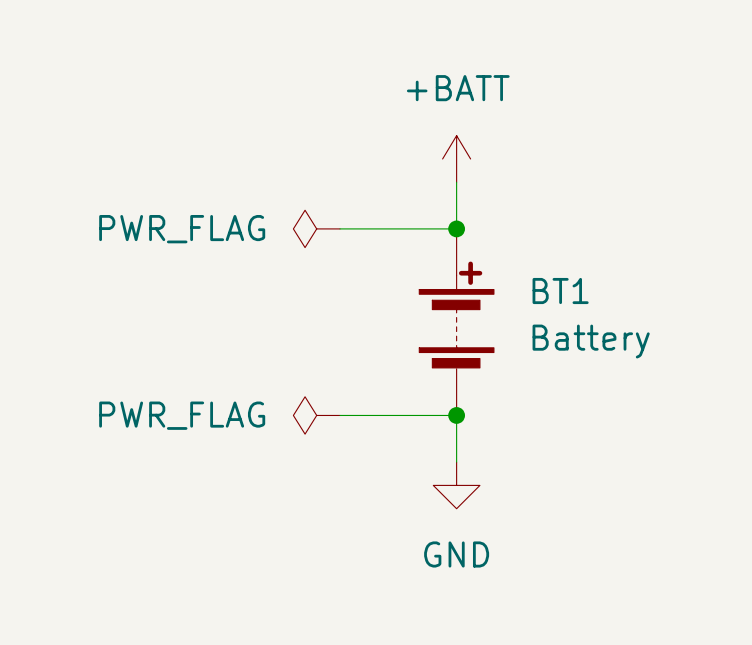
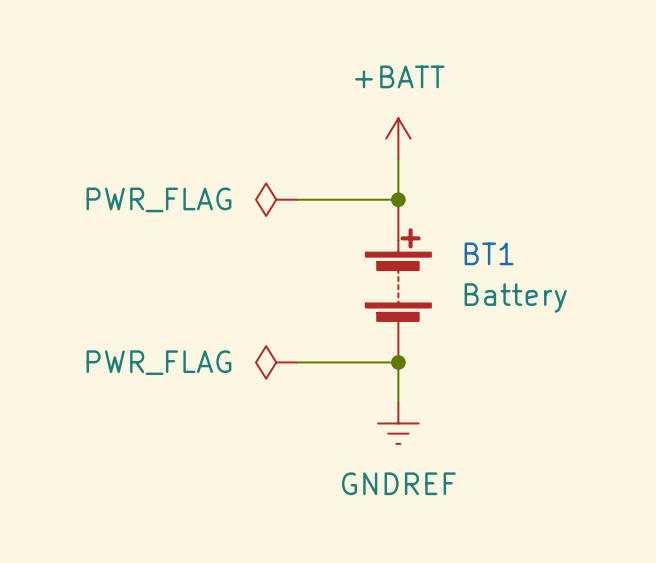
power symbol: GND (456, 485) -> GNDREF (398, 423)

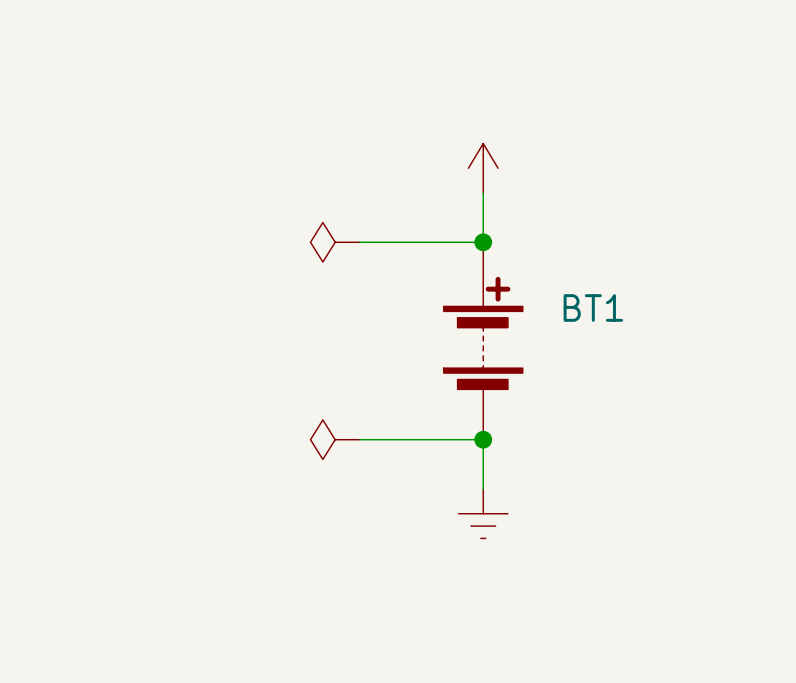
power symbol text: +BATT (399, 76) -> none
power symbol text: PWR_FLAG (158, 199) -> none
BT1 value: Battery (515, 297) -> none
power symbol text: PWR_FLAG (158, 362) -> none
power symbol text: GNDREF (398, 483) -> none

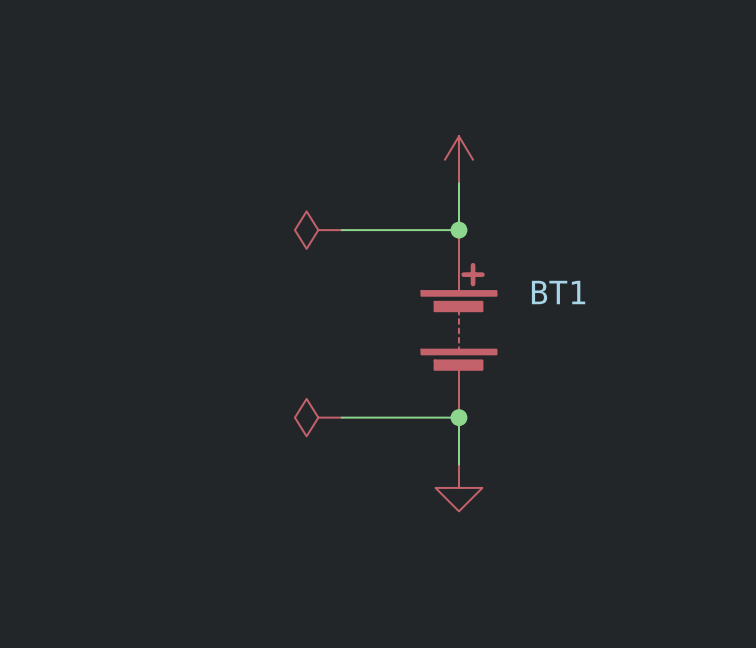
power symbol shape: [458, 489, 508, 539] -> [435, 464, 483, 512]

